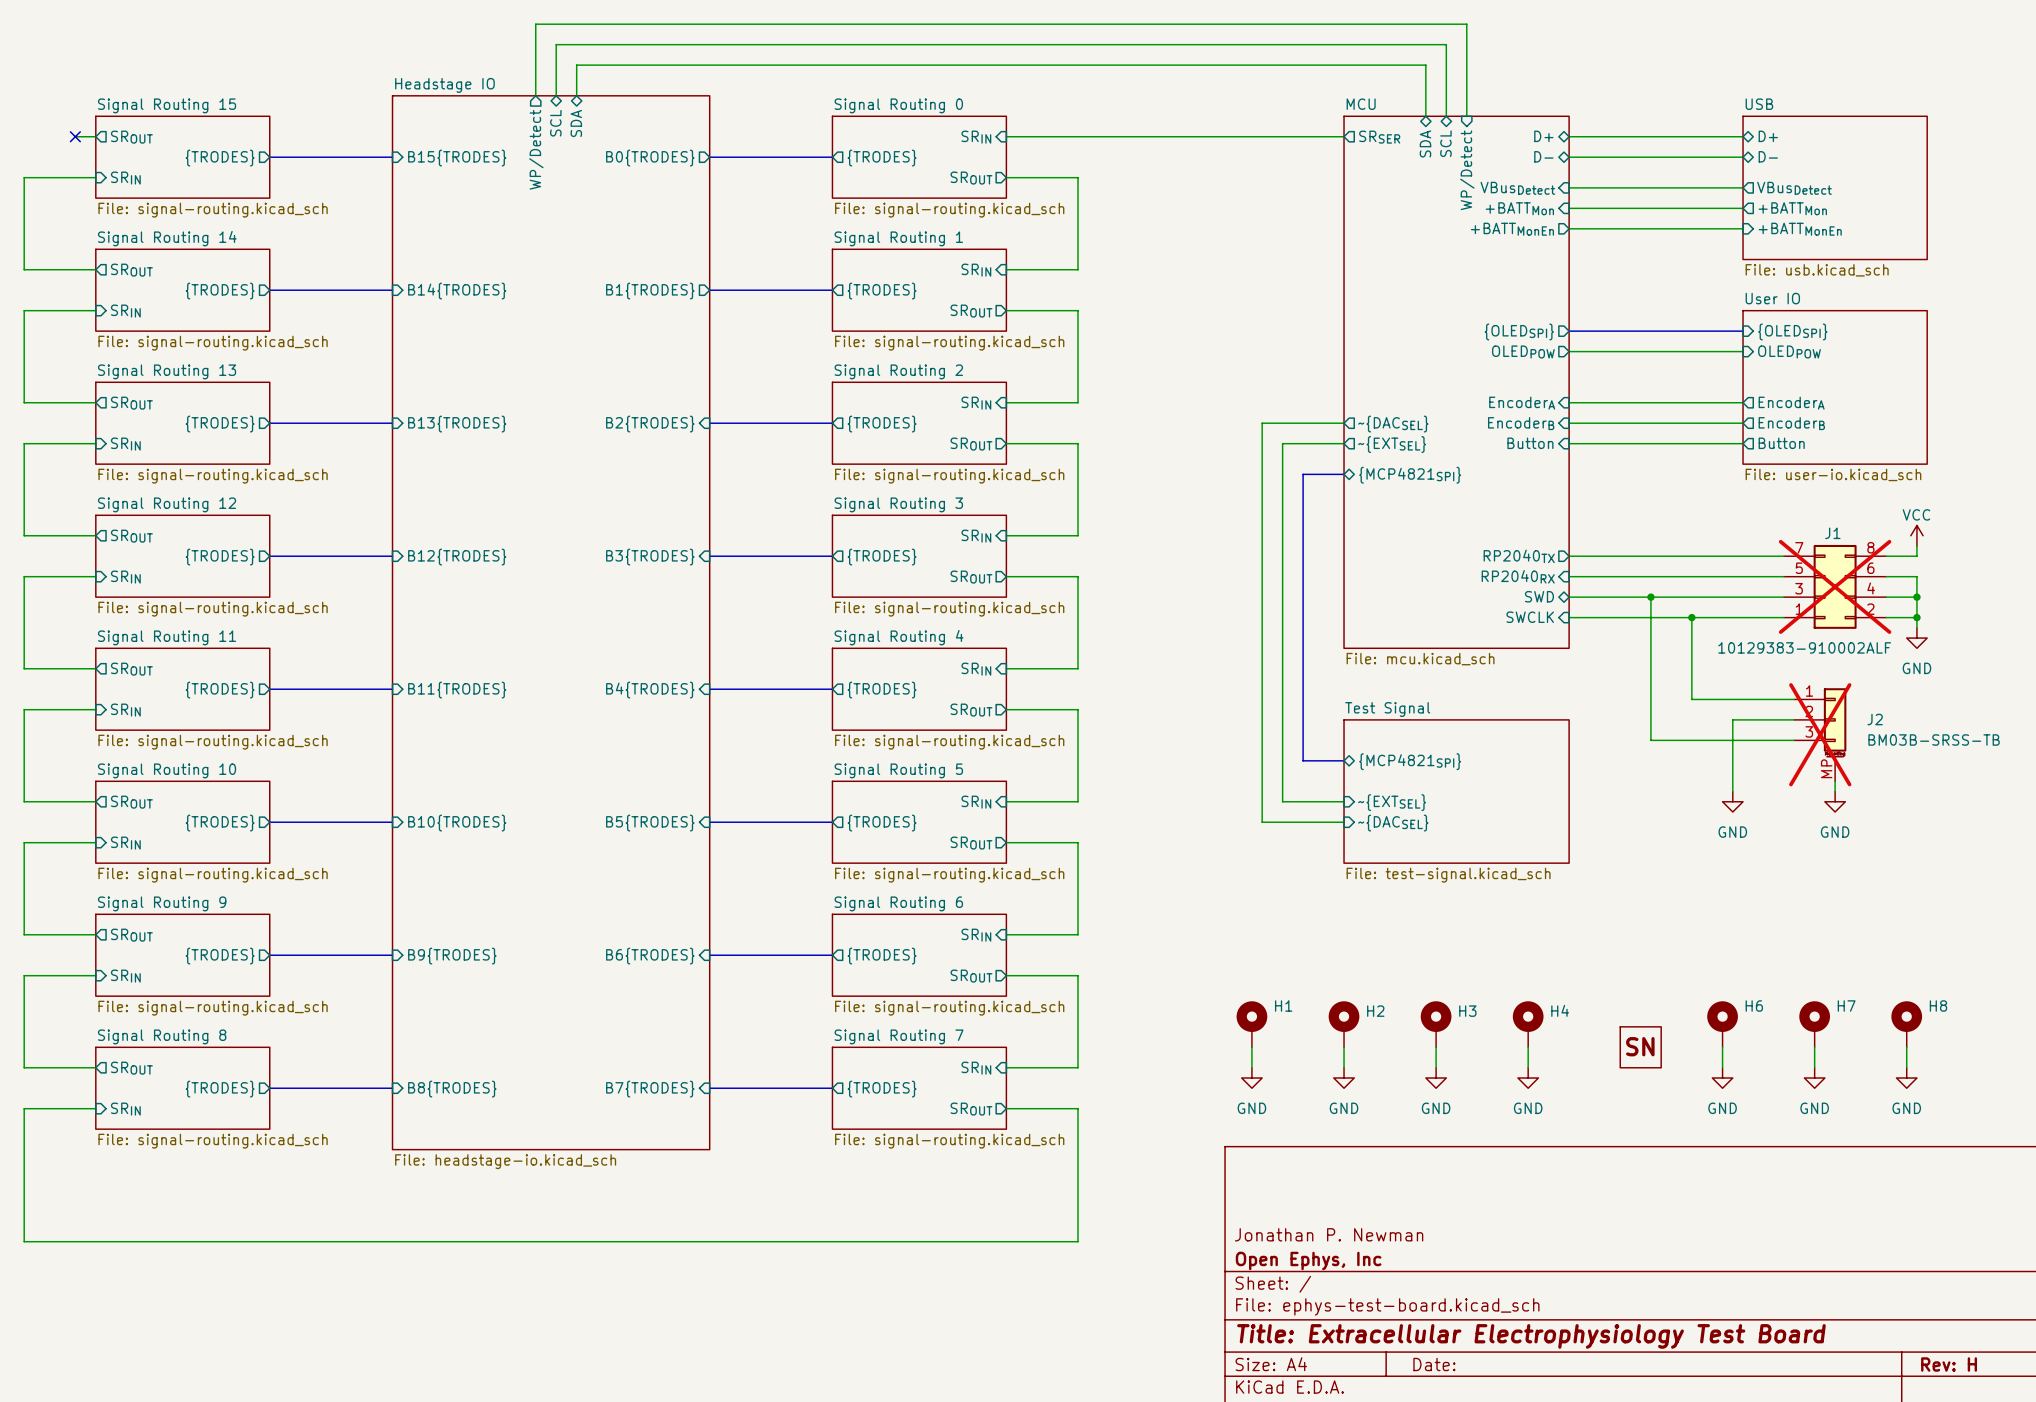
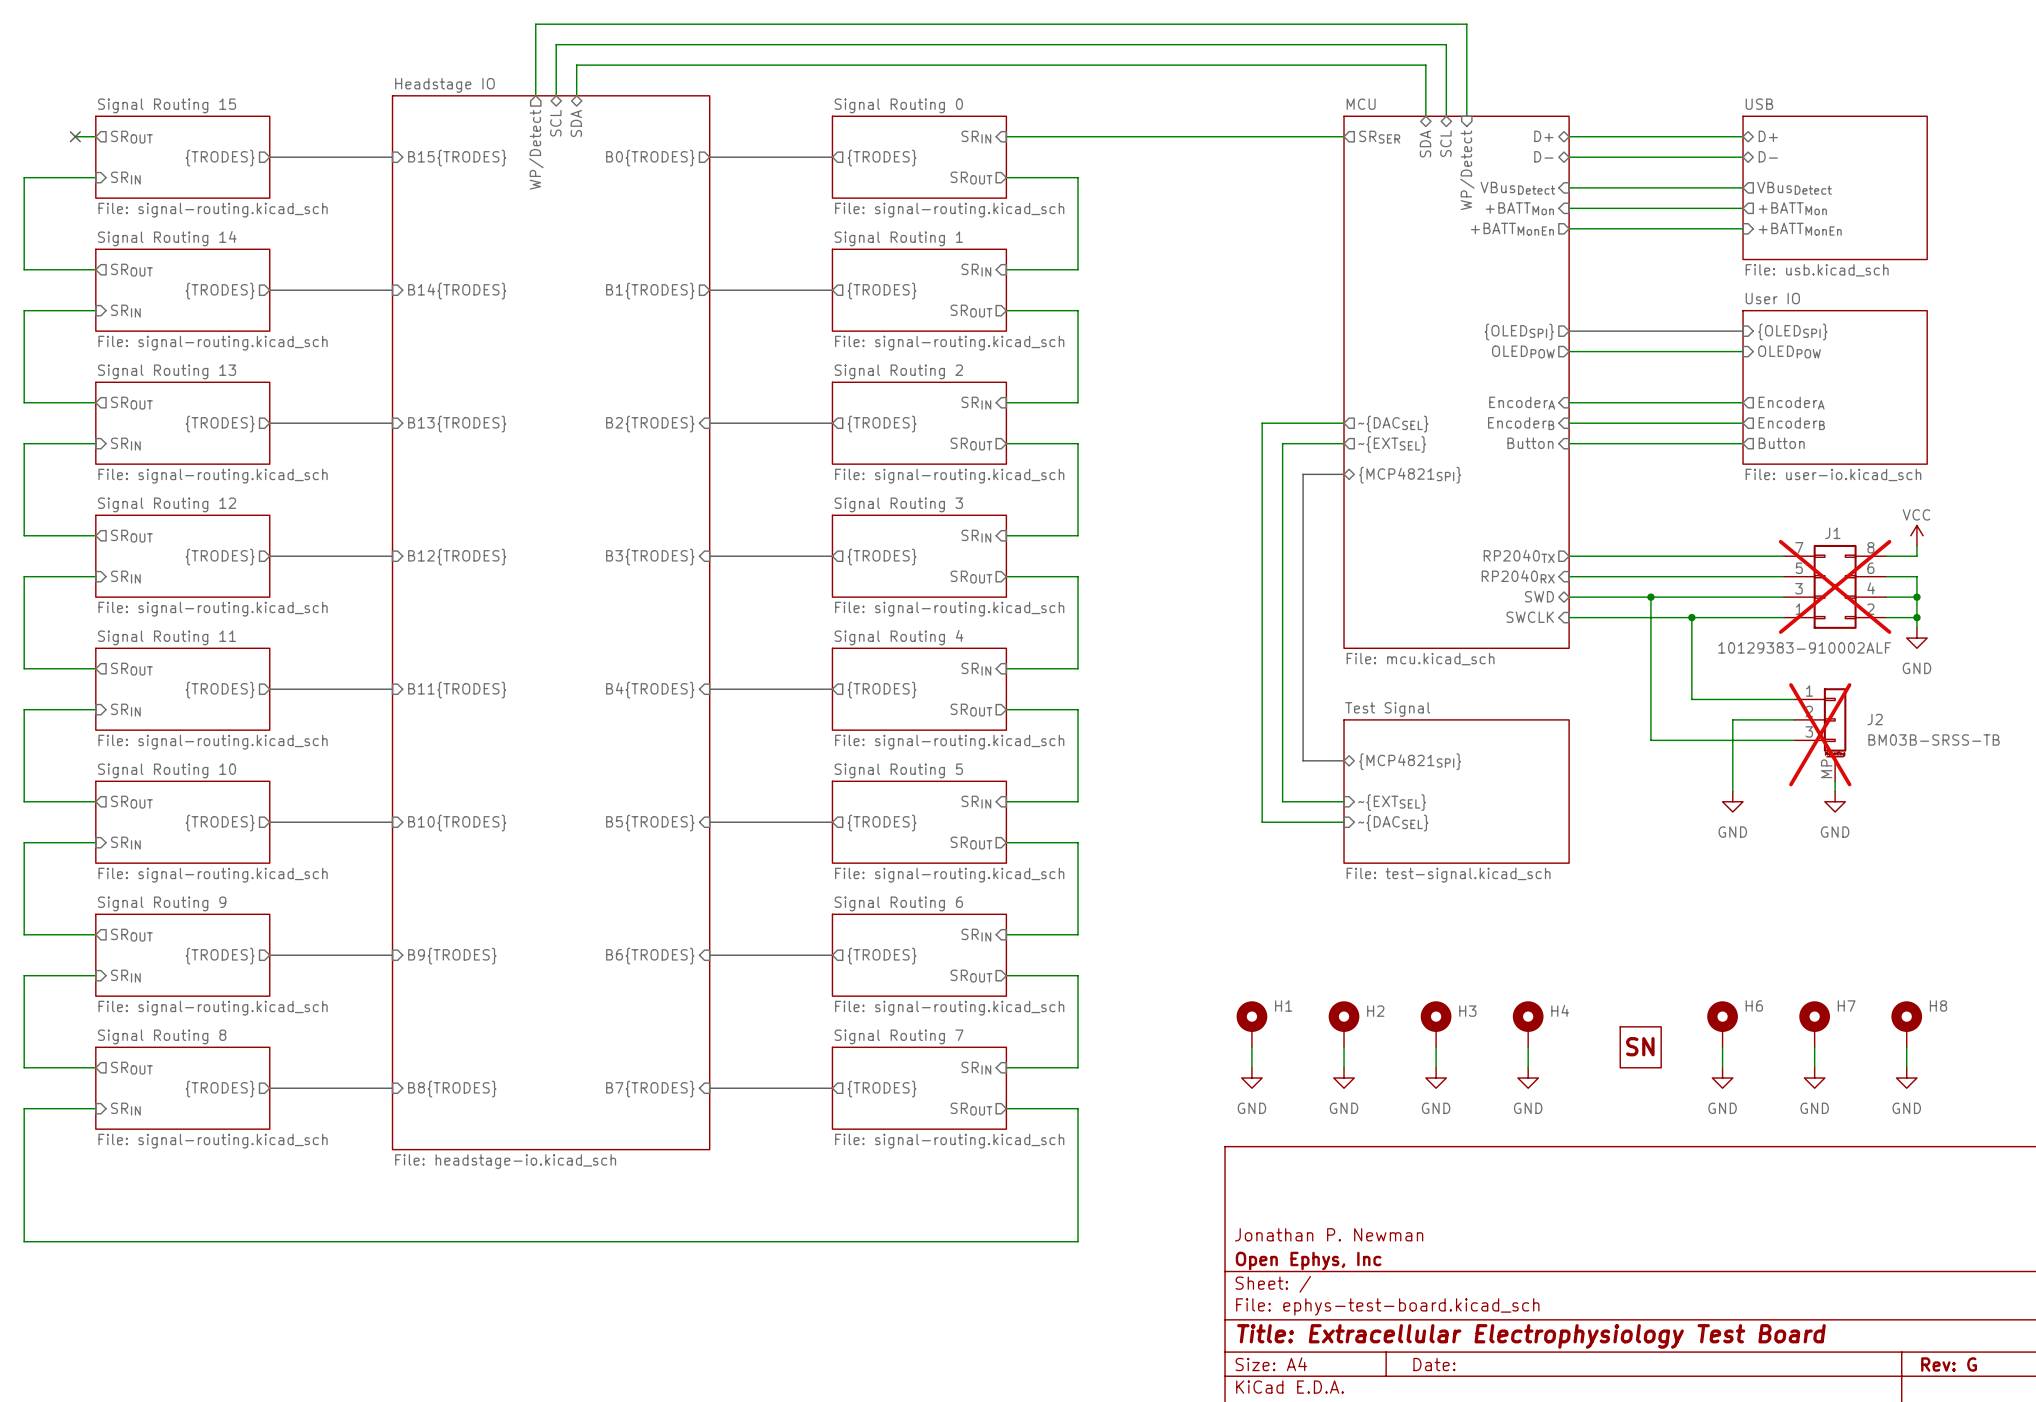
title block: Rev: H (1949, 1364) -> Rev: G (1949, 1364)

